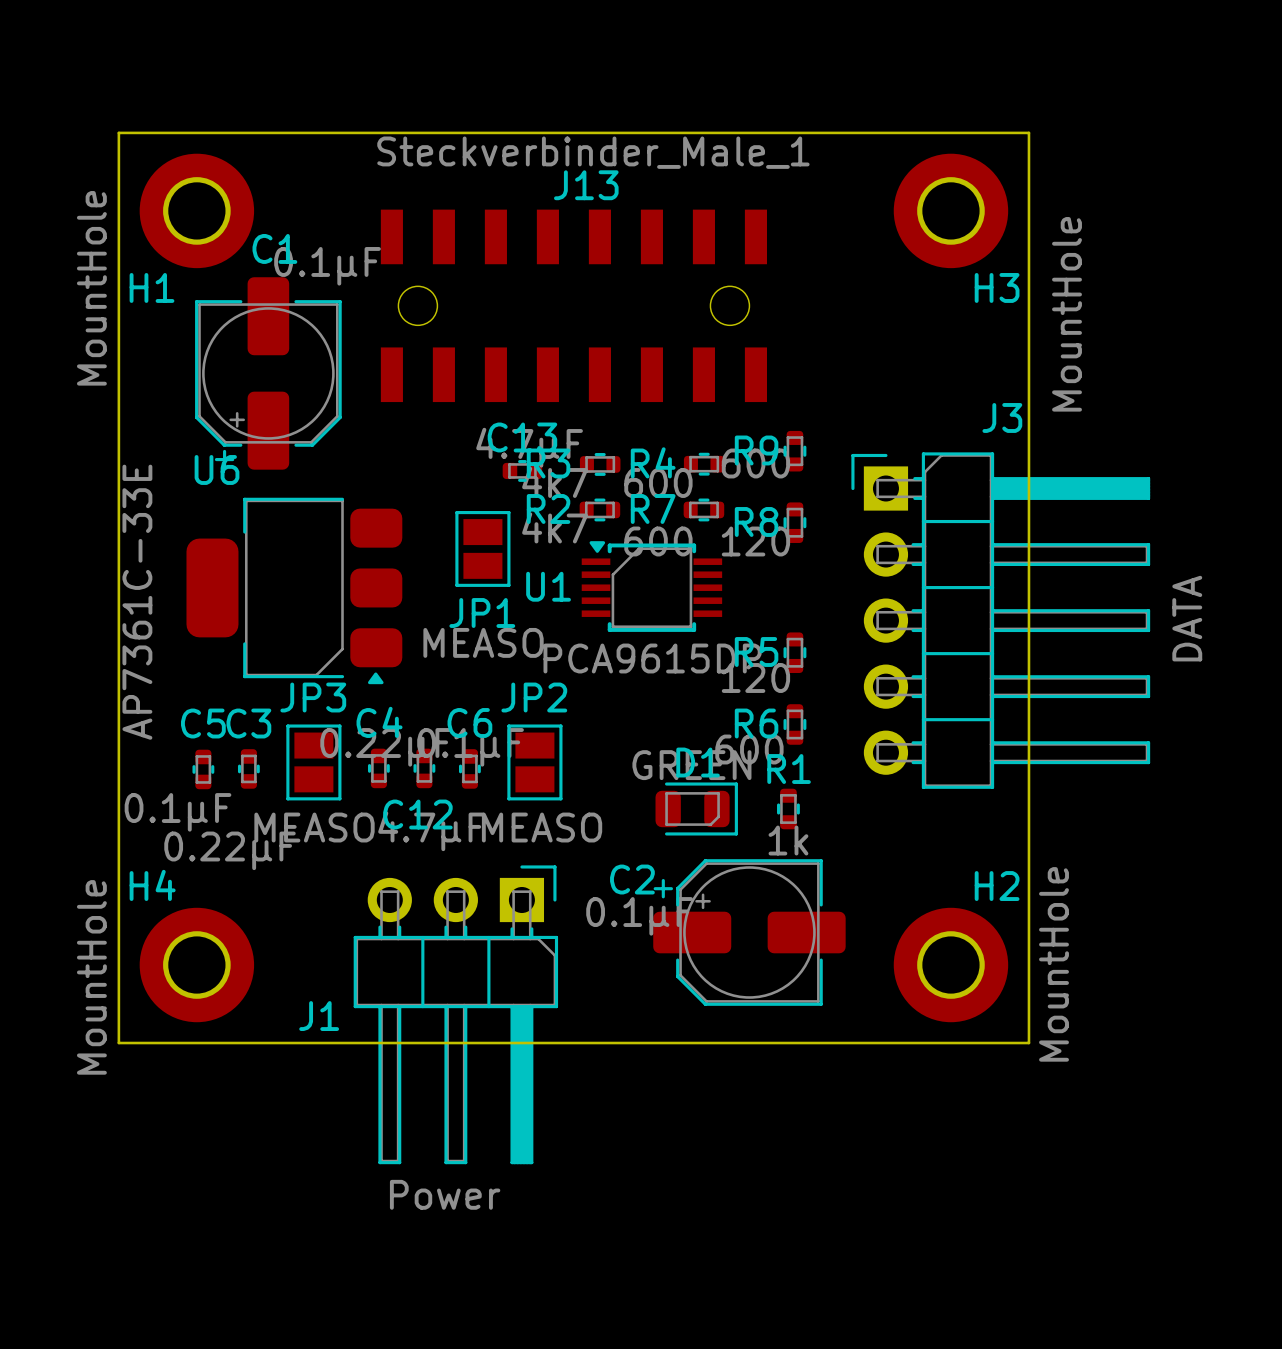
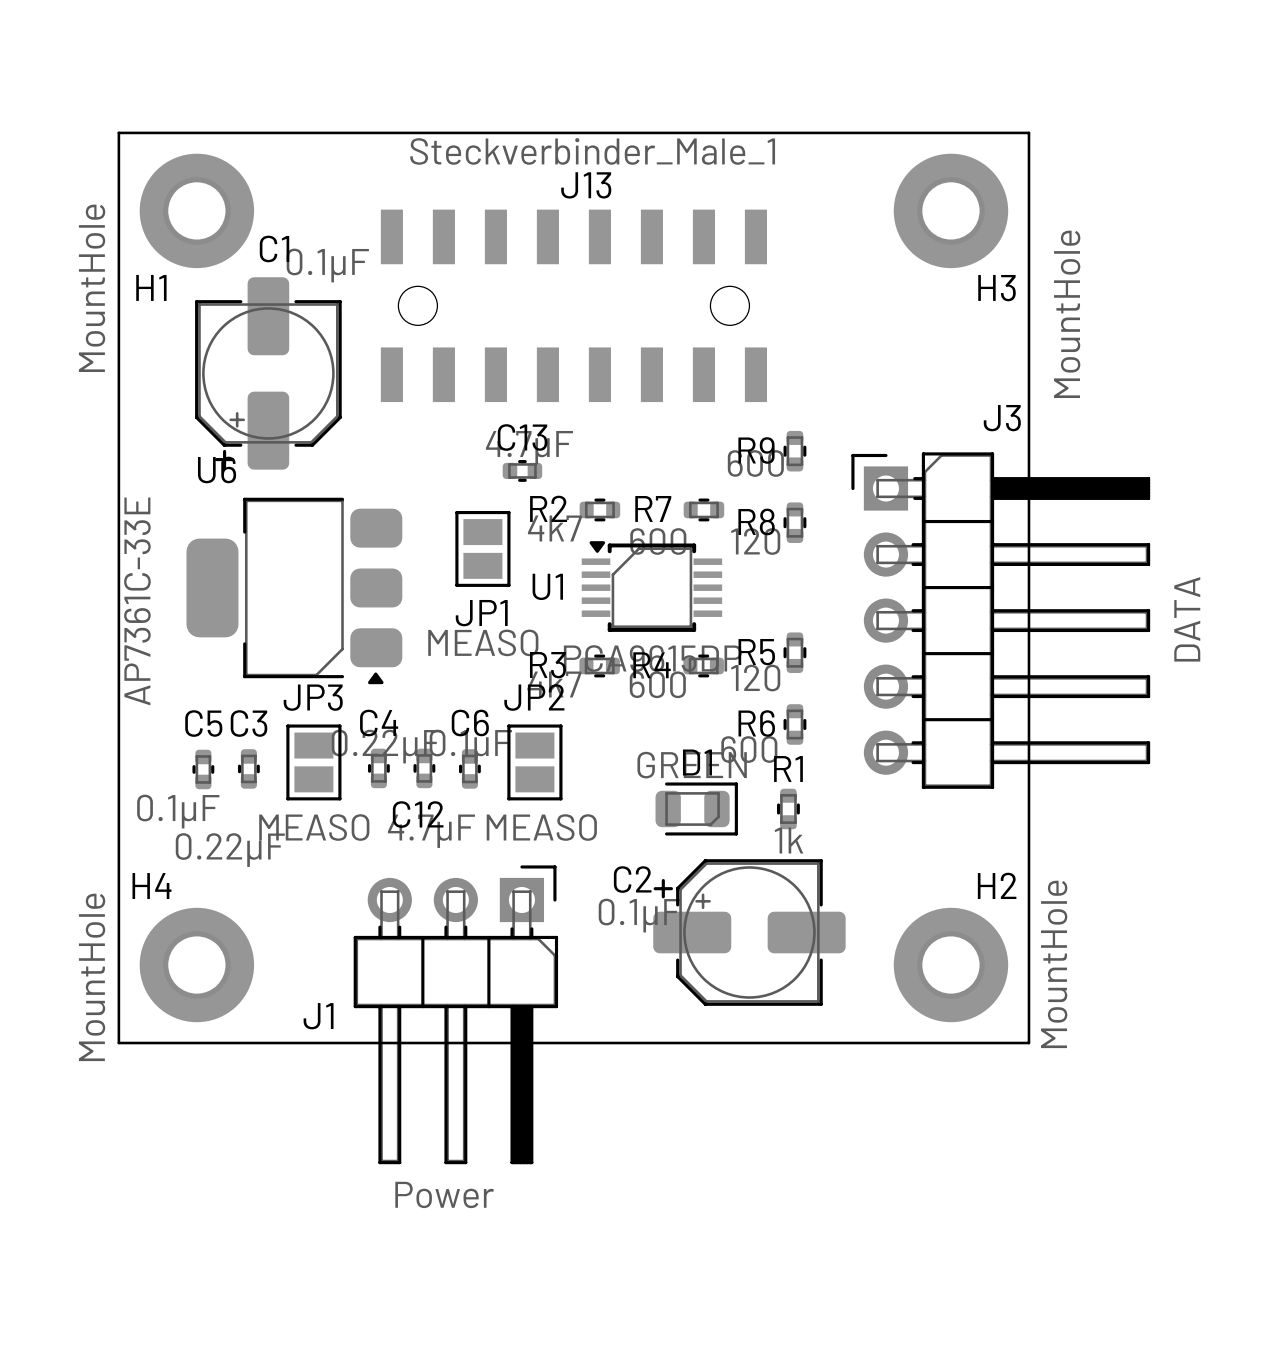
R3 position: (600, 464) -> (599, 665)
R4 position: (704, 464) -> (703, 665)

